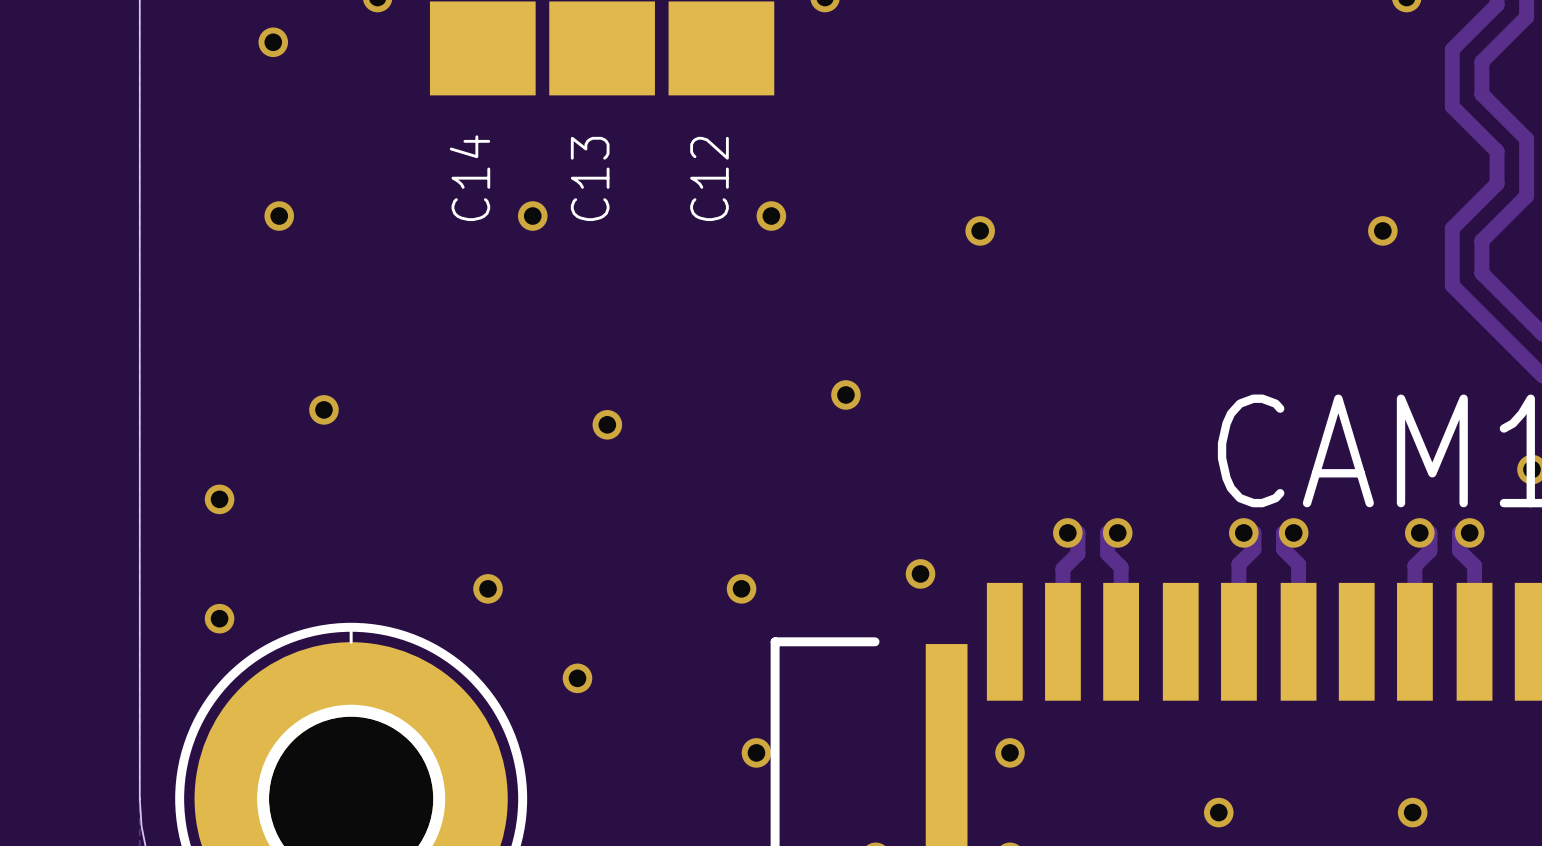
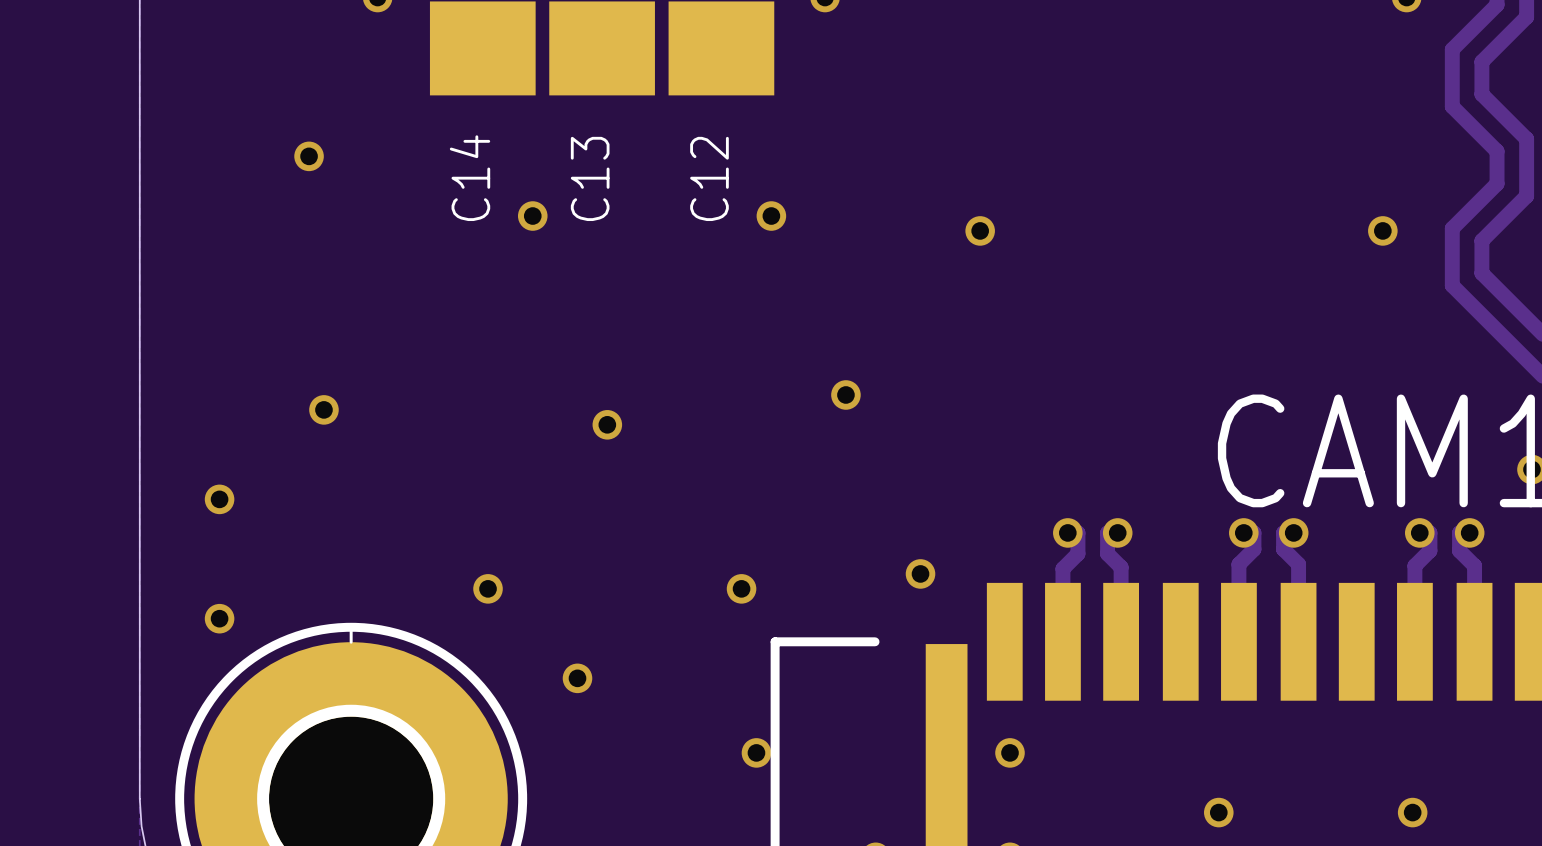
via: (273, 42) -> none
via: none -> (309, 156)
via: (279, 216) -> none

